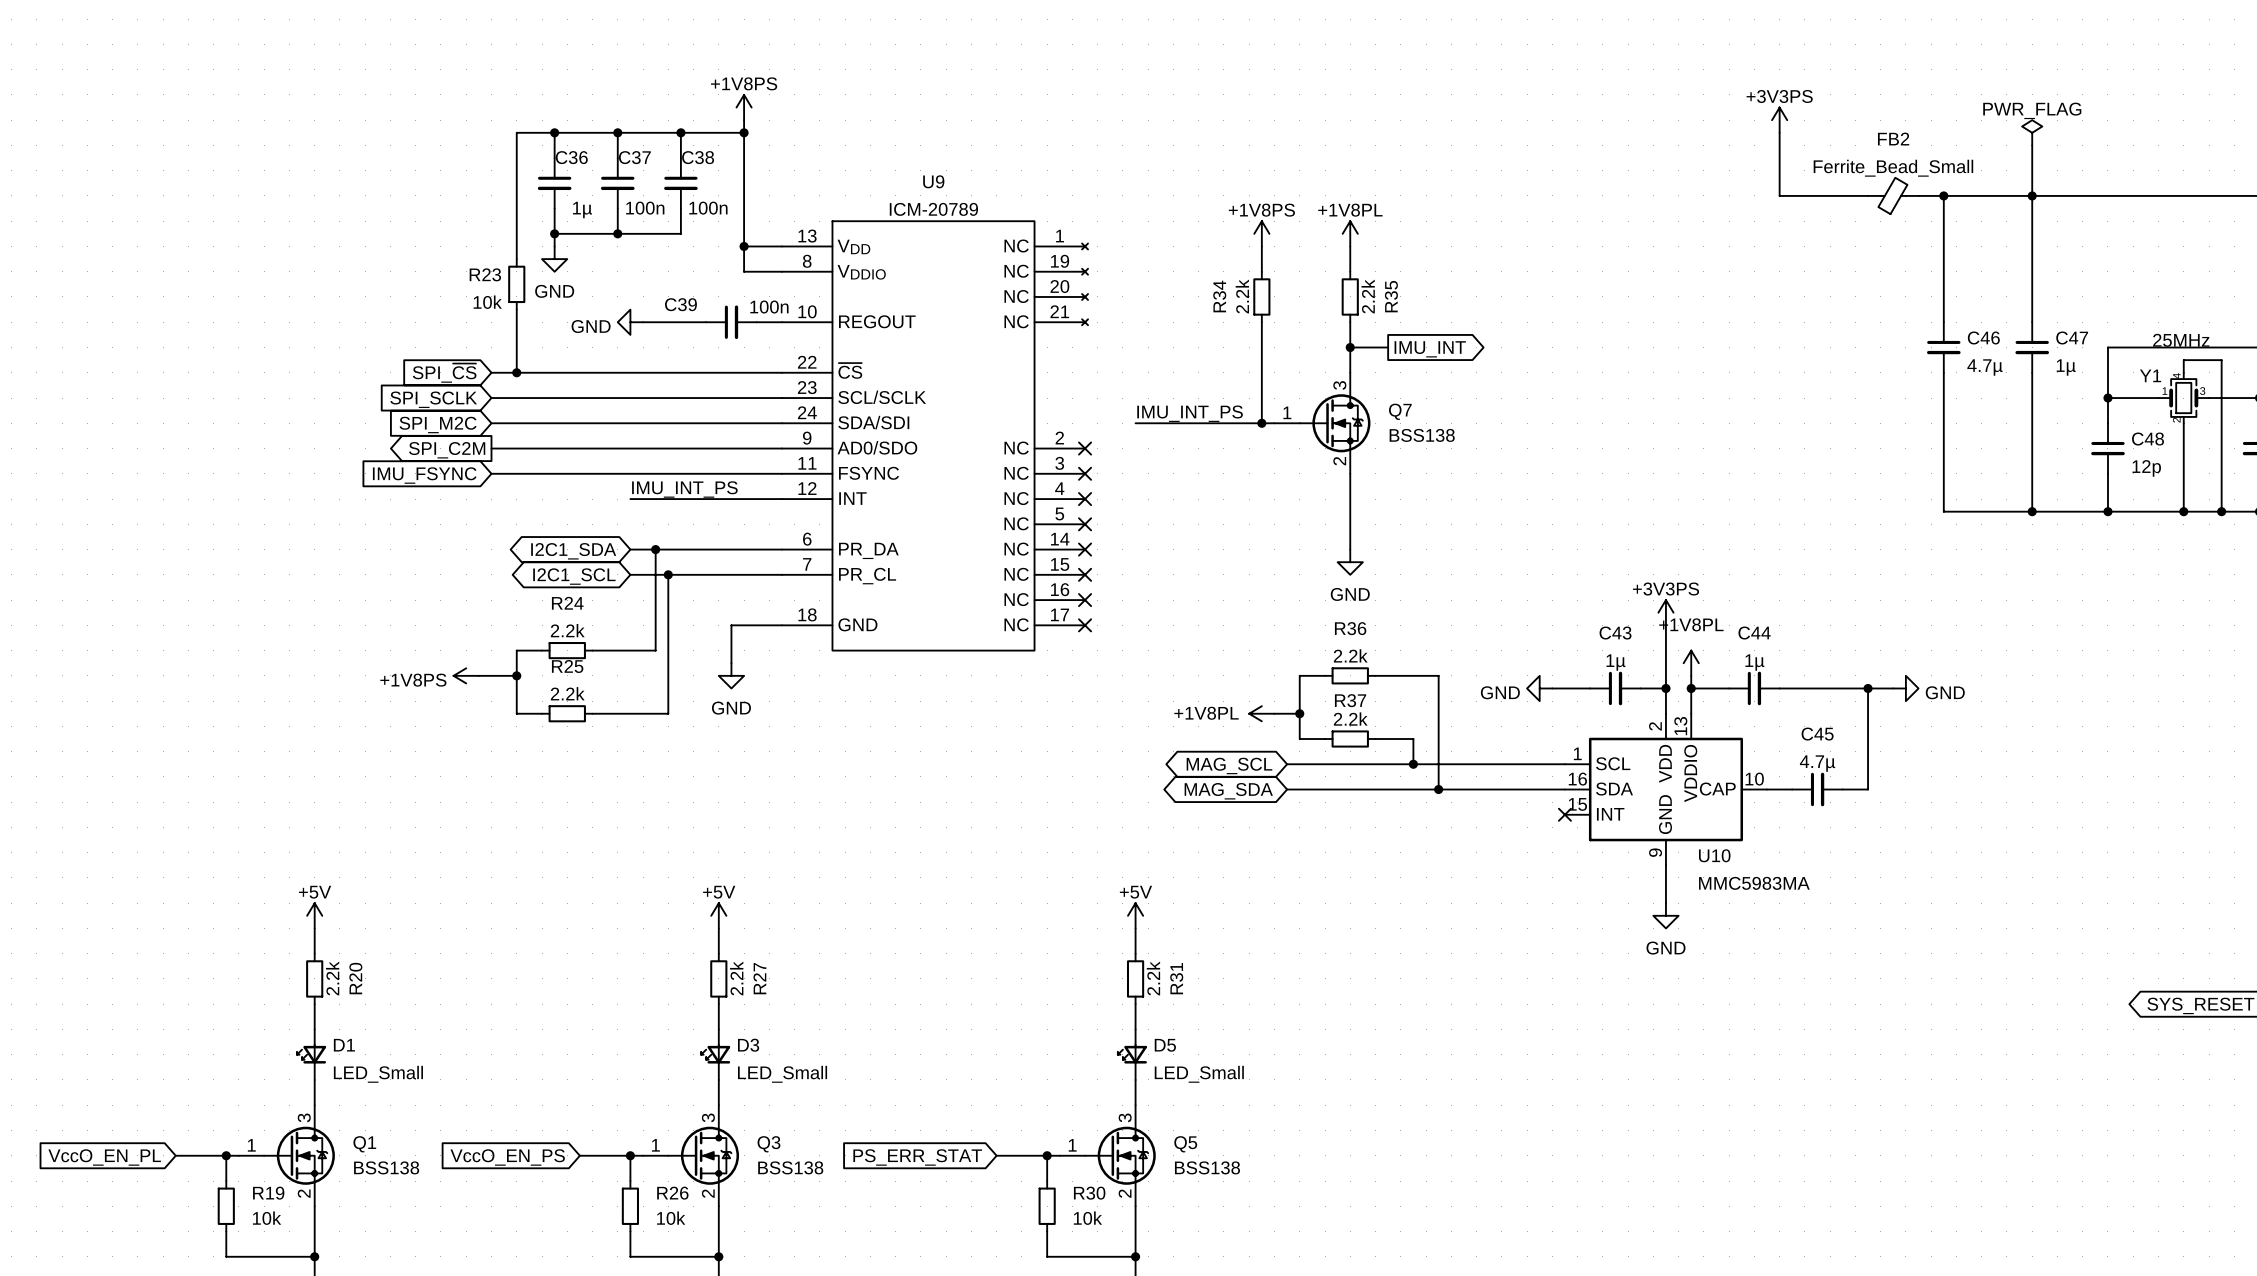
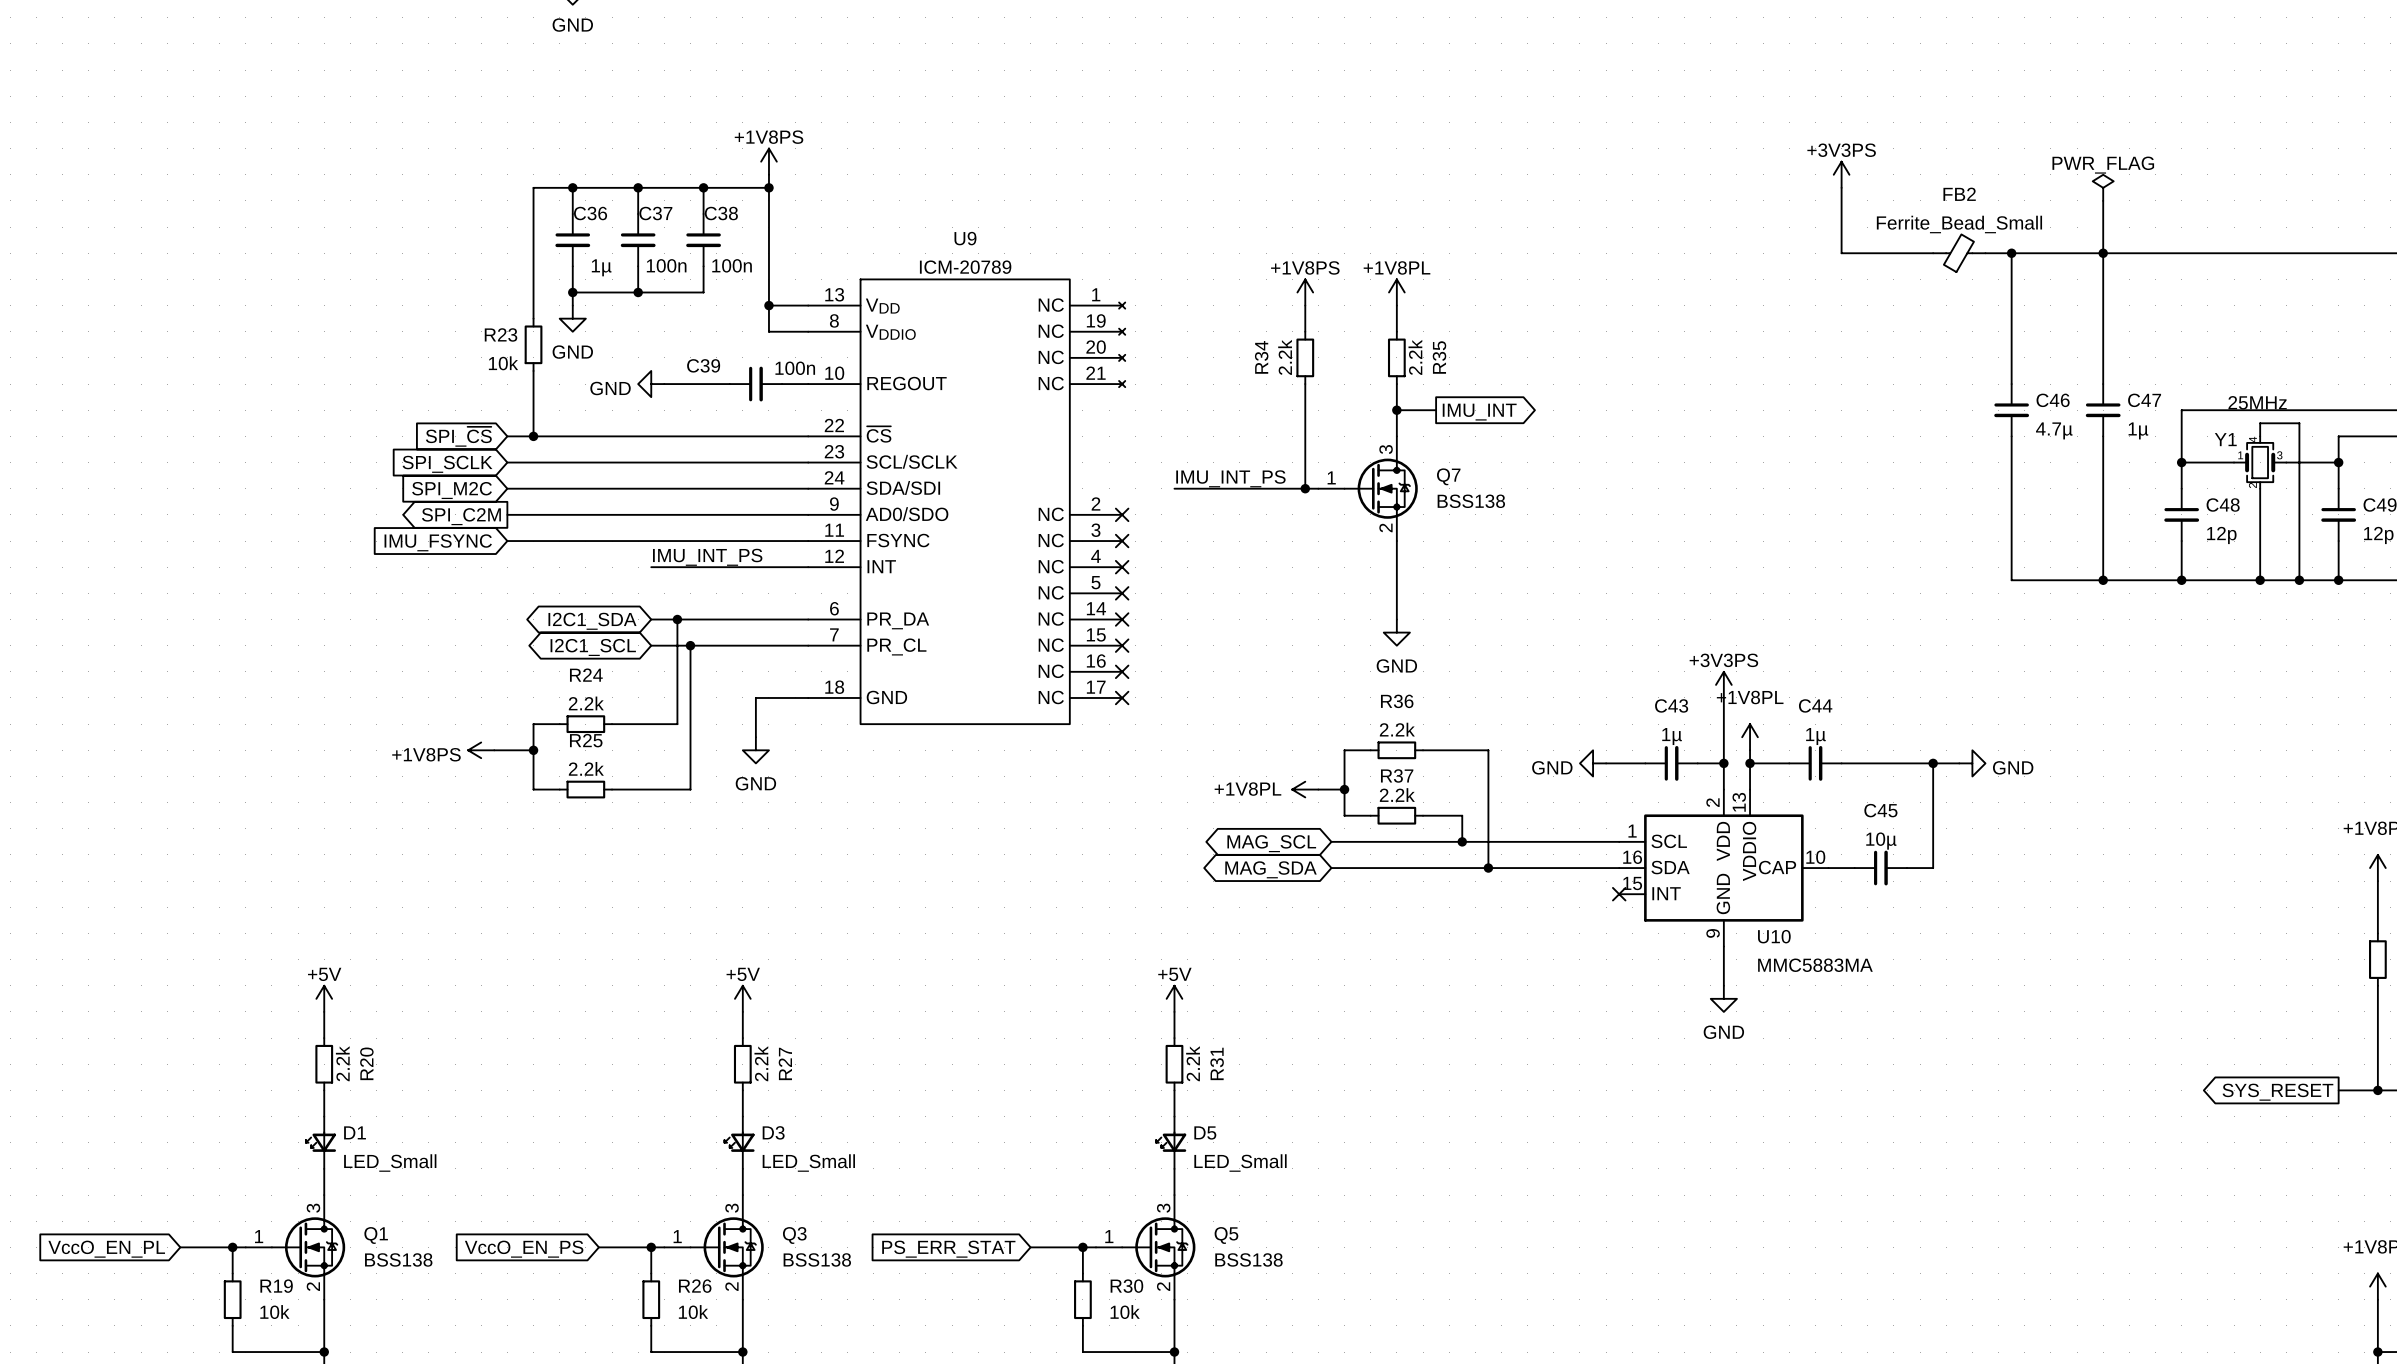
C45 value: 4.7µ (1817, 763) -> 10µ (1881, 841)
U10 value: MMC5983MA (1754, 883) -> MMC5883MA (1815, 965)

